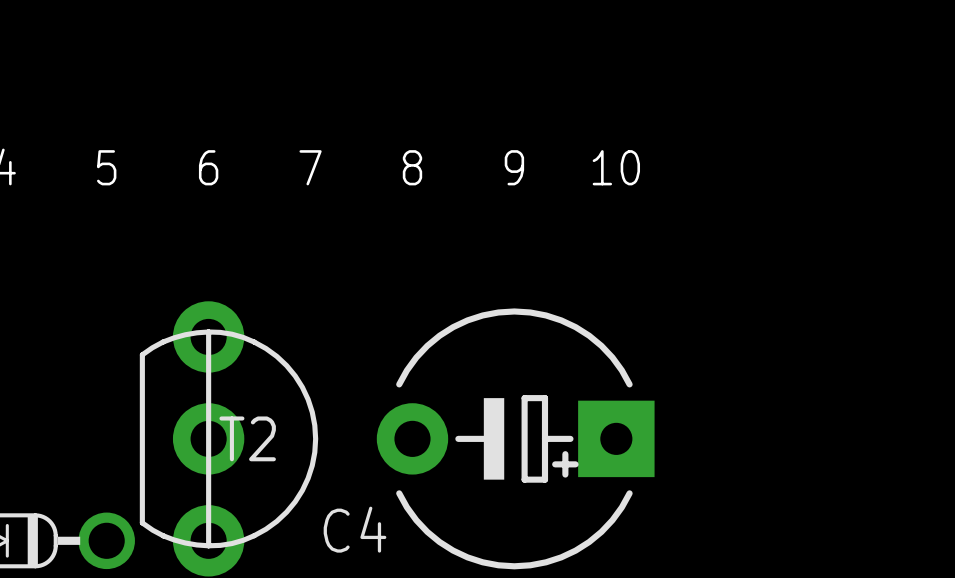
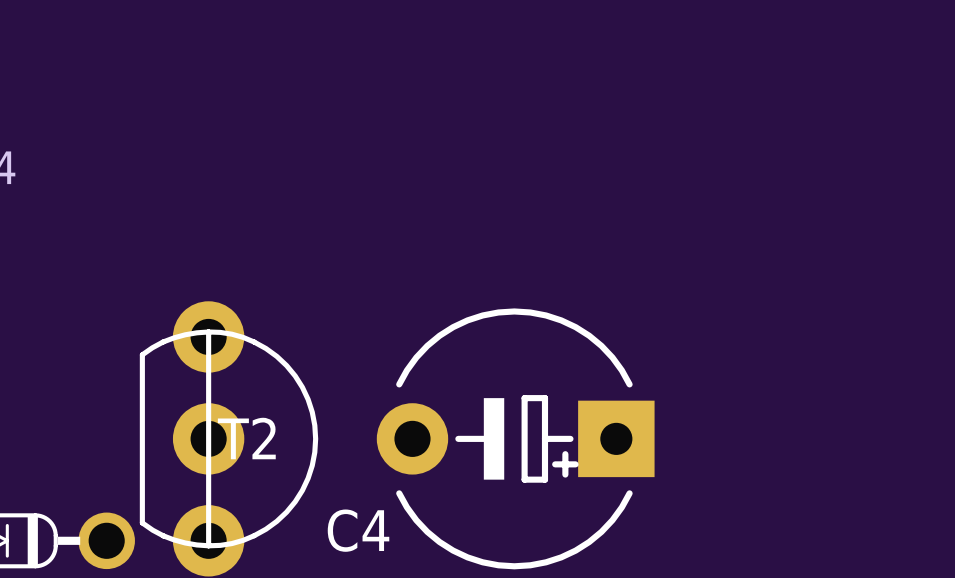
text: 5 (106, 167) -> none
text: 6 (208, 167) -> none
text: 7 (310, 167) -> none
text: 8 (412, 167) -> none
text: 9 (514, 167) -> none
text: 10 (616, 167) -> none

